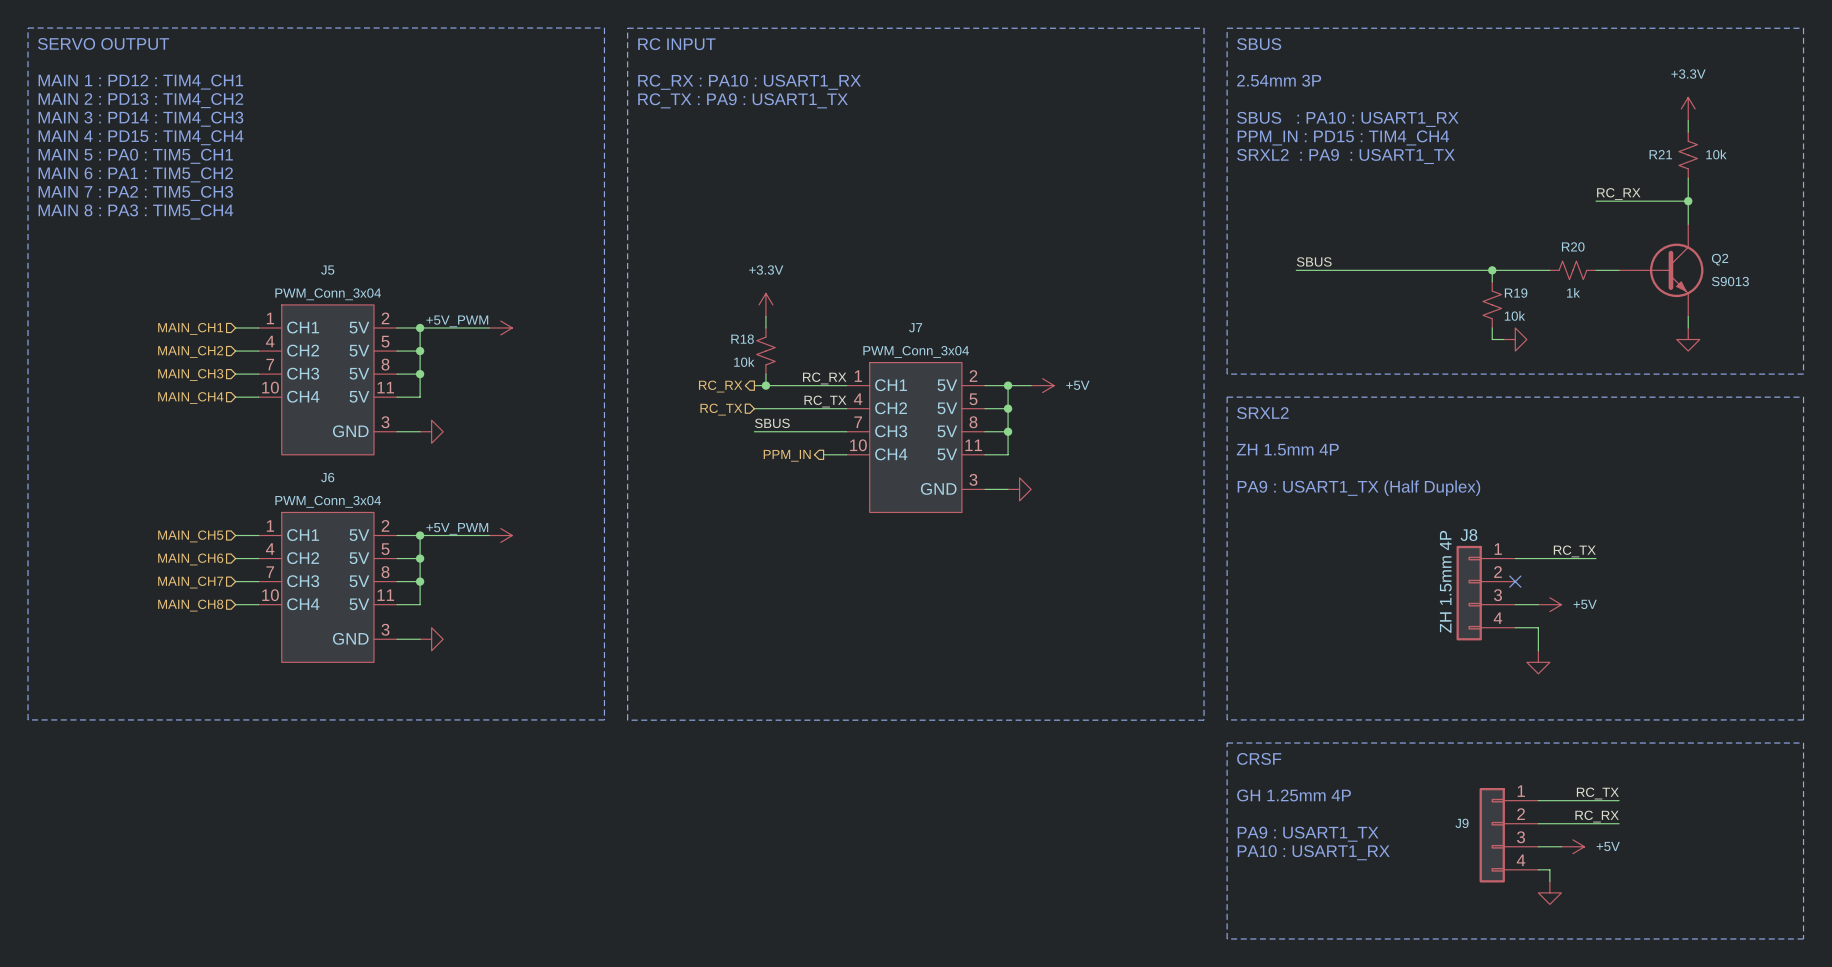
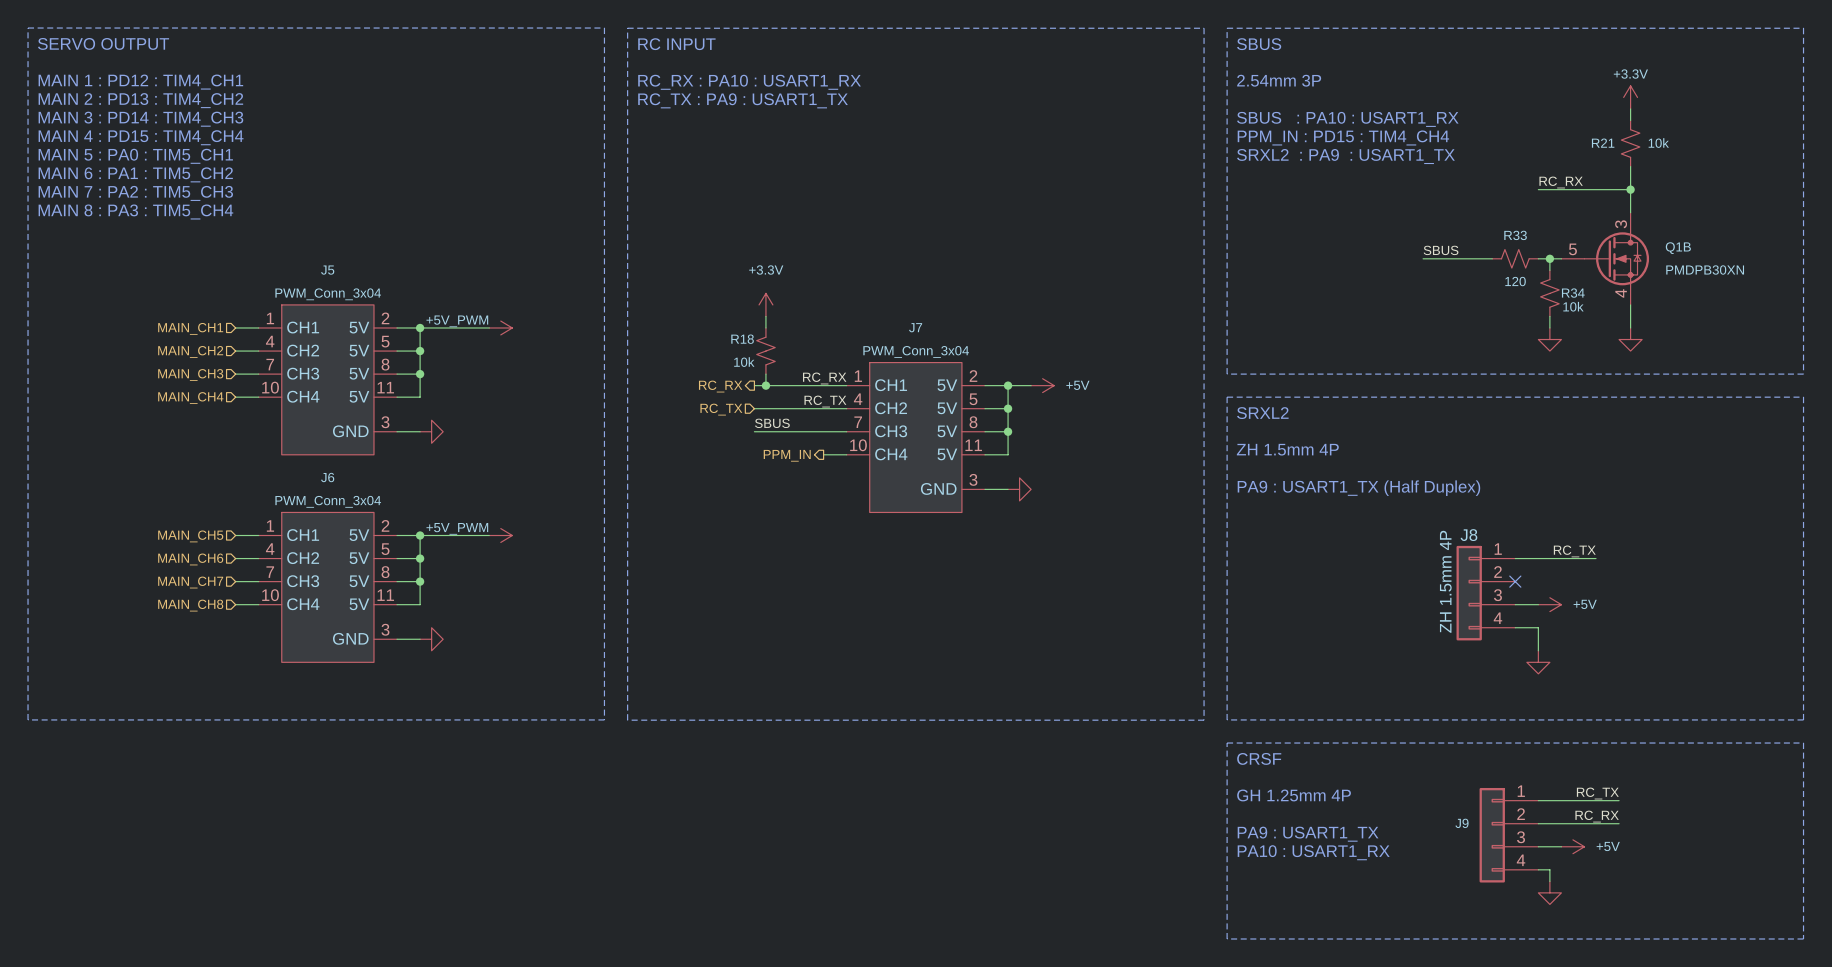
power symbol text position: +3.3V (1688, 74) -> +3.3V (1630, 74)
power symbol position: +3.3V (1688, 108) -> +3.3V (1630, 97)
wire: (1688, 120) (1688, 132) -> (1630, 108) (1630, 120)
R21 position: (1688, 155) -> (1630, 143)
wire: (1688, 178) (1688, 224) -> (1630, 166) (1630, 212)
junction: none -> (1630, 189)
label position: RC_RX (1618, 194) -> RC_RX (1561, 182)
wire: (1596, 201) (1688, 201) -> (1538, 189) (1630, 189)
junction: (1688, 201) -> none
wire: none -> (1423, 258) (1492, 258)
R33: none -> 120 (1515, 258)
junction: none -> (1549, 258)
Q1B: none -> PMDPB30XN (1605, 258)
label position: SBUS (1314, 261) -> SBUS (1441, 250)
wire: (1296, 270) (1549, 270) -> (1549, 258) (1549, 270)
wire: (1492, 270) (1492, 281) -> (1549, 316) (1549, 327)
junction: (1492, 270) -> none
R20: 1k (1572, 270) -> none
wire: (1596, 270) (1619, 270) -> (1538, 258) (1561, 258)
Q2: S9013 (1661, 270) -> none
R34: none -> 10k (1549, 293)
R19: 10k (1492, 304) -> none
wire: none -> (1630, 304) (1630, 327)
wire: (1688, 316) (1688, 327) -> none
wire: (1492, 327) (1492, 339) (1503, 339) -> none
power symbol rotation: 0° (1515, 339) -> 90° clockwise (1549, 339)
power symbol position: (1515, 339) -> (1549, 339)
power symbol: none -> (1630, 339)
power symbol: (1688, 339) -> none

